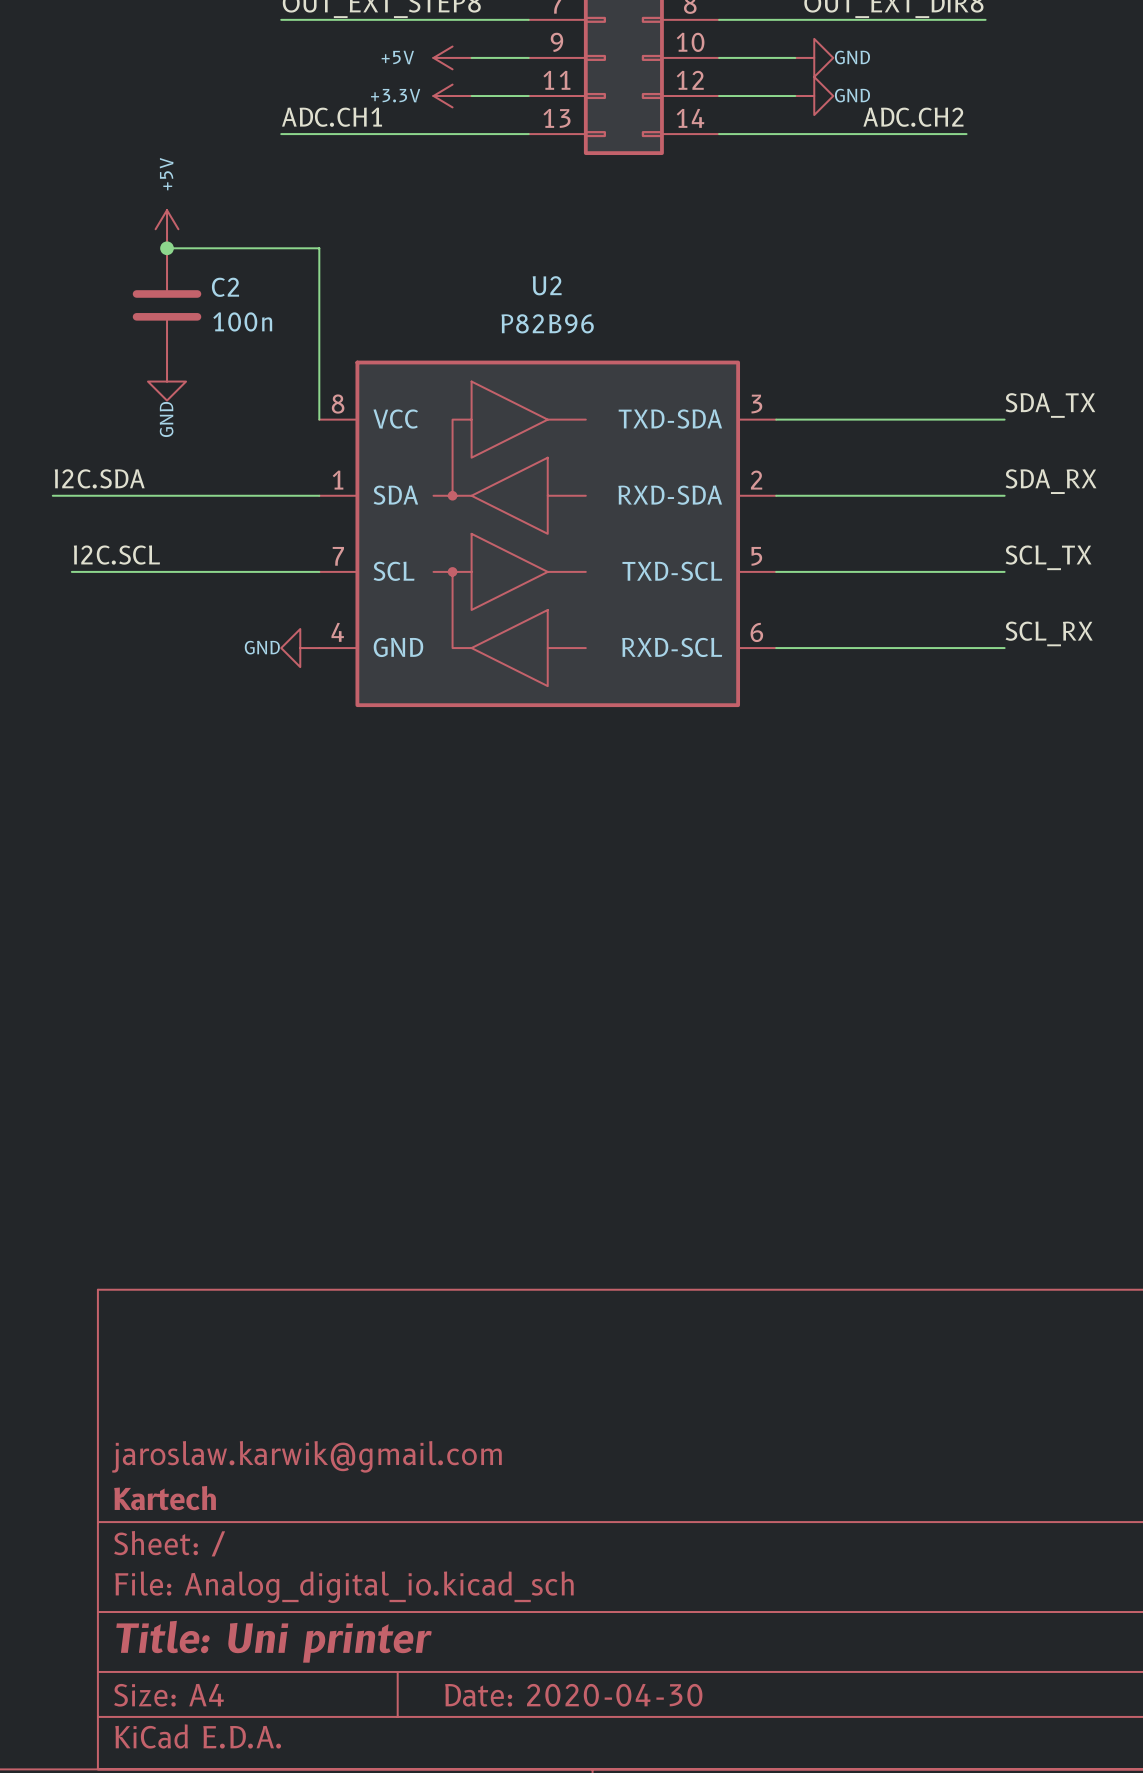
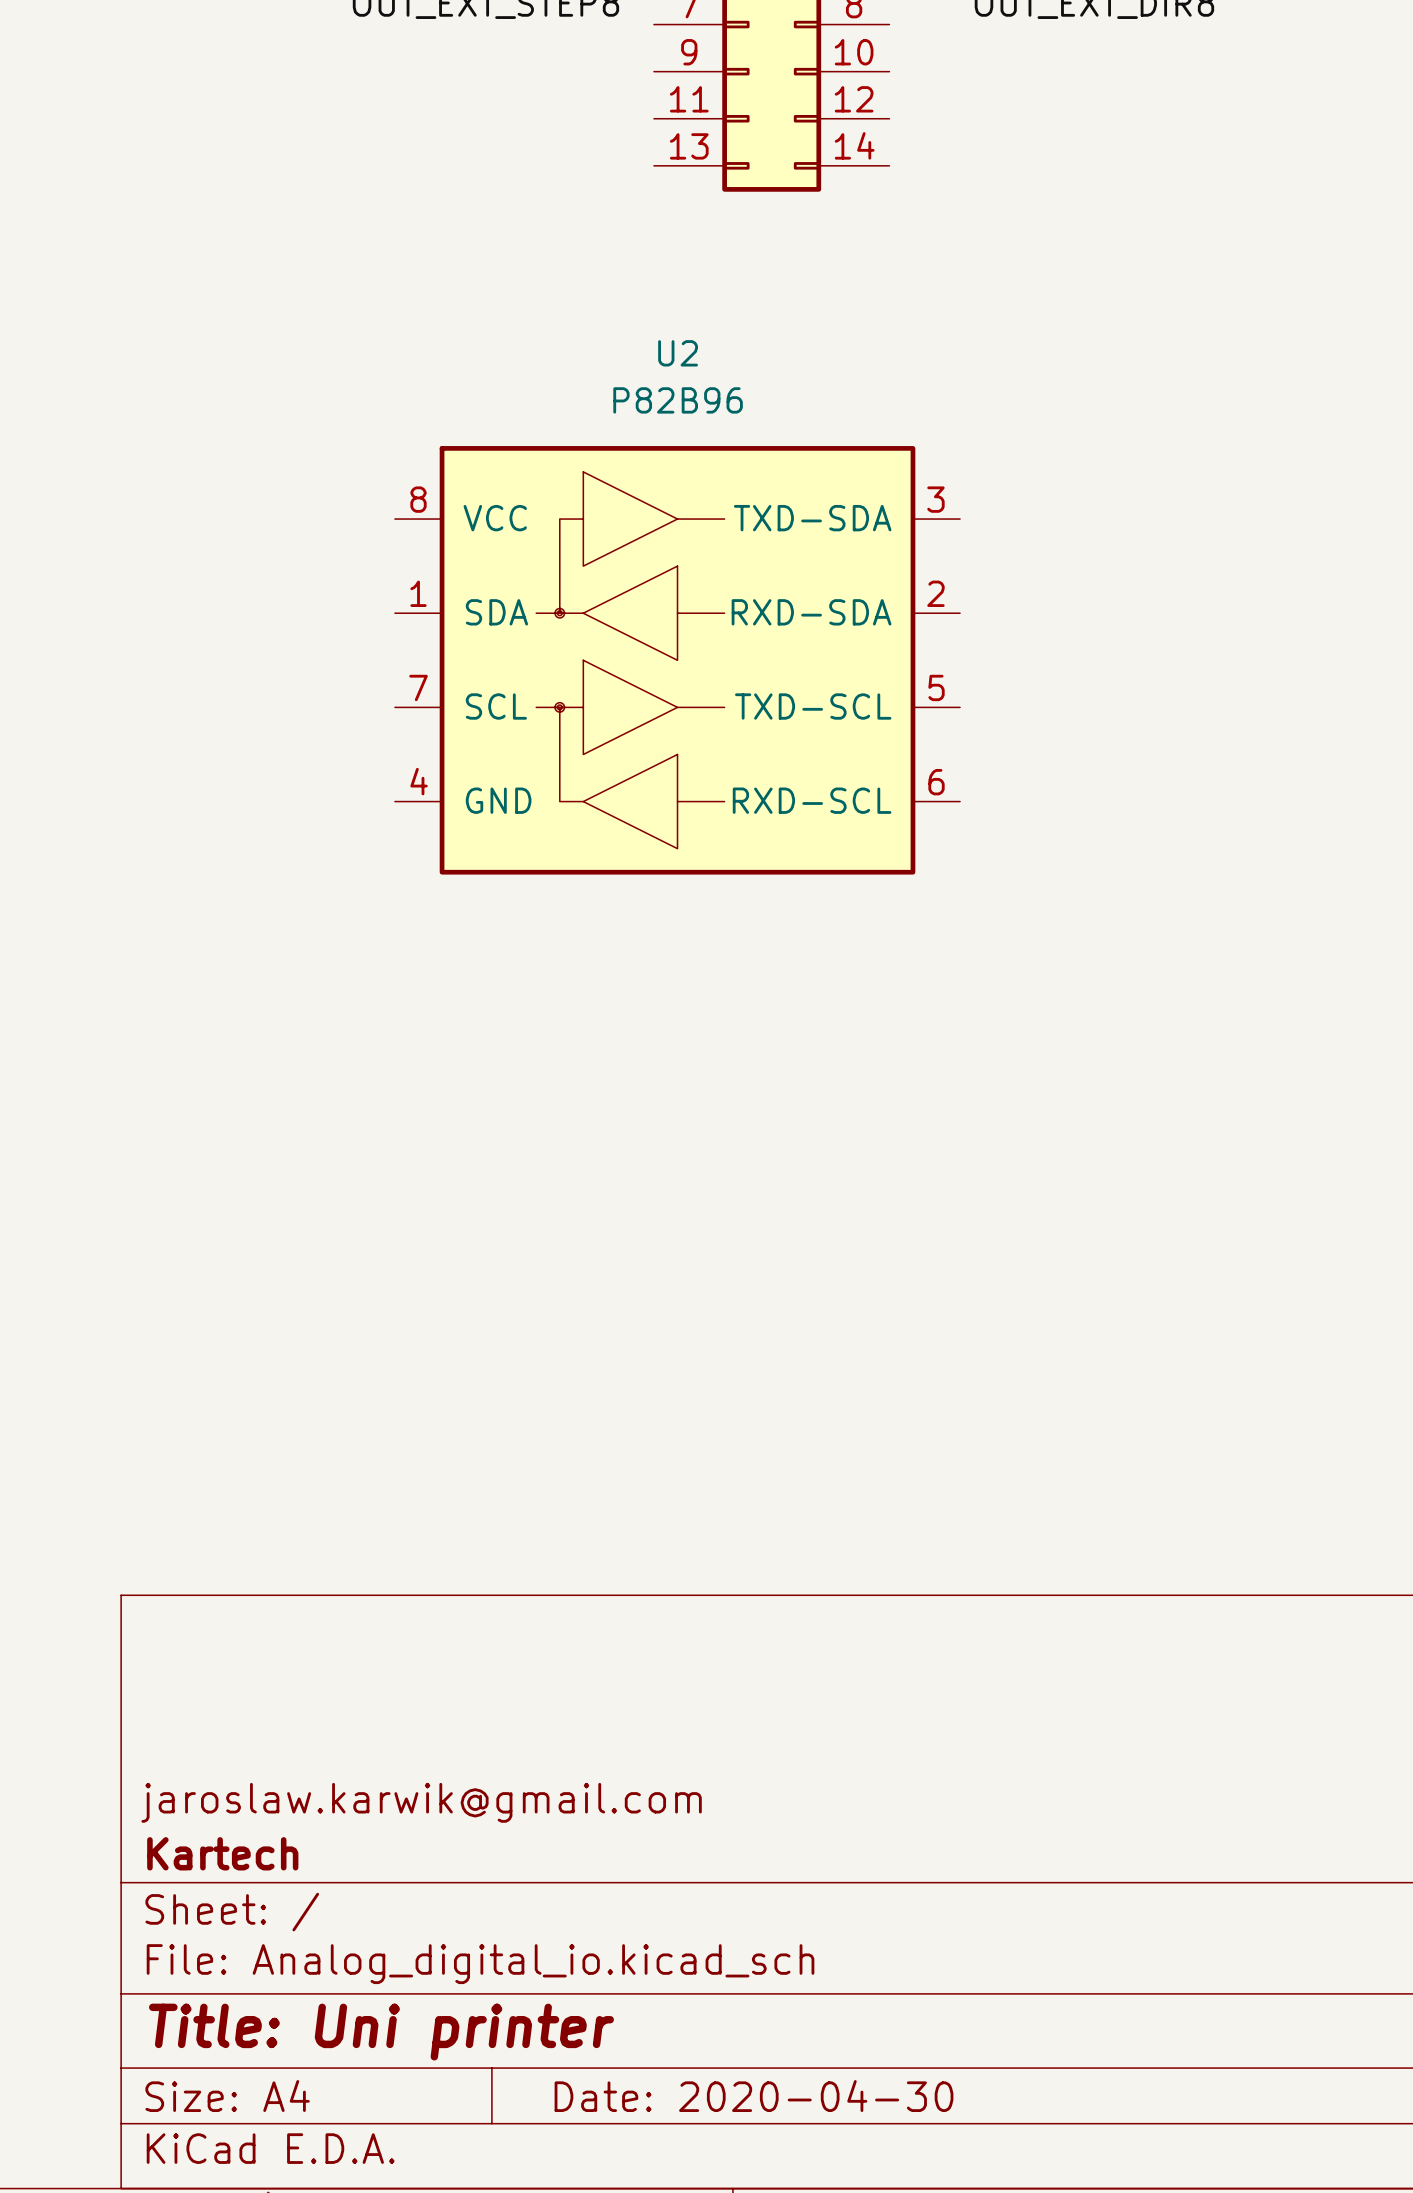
wire: (281, 19) (528, 19) -> none
wire: (719, 19) (985, 19) -> none
power symbol: +5V (452, 57) -> none
wire: (471, 57) (528, 57) -> none
wire: (719, 57) (795, 57) -> none
power symbol: GND (814, 57) -> none
power symbol: +3.3V (452, 96) -> none
wire: (471, 96) (528, 96) -> none
wire: (719, 96) (795, 96) -> none
power symbol: GND (814, 96) -> none
label: ADC.CH1 (332, 117) -> none
label: ADC.CH2 (913, 117) -> none
wire: (281, 134) (528, 134) -> none
wire: (719, 134) (966, 134) -> none
power symbol: +5V (167, 229) -> none
wire: (167, 248) (319, 248) (319, 419) -> none
junction: (167, 248) -> none
C2: 100n (167, 305) -> none
power symbol: GND (167, 381) -> none
label: SDA_TX (1050, 405) -> none
wire: (776, 419) (1004, 419) -> none
label: I2C.SDA (99, 478) -> none
label: SDA_RX (1051, 481) -> none
wire: (52, 495) (319, 495) -> none
wire: (776, 495) (1004, 495) -> none
label: I2C.SCL (116, 555) -> none
label: SCL_TX (1048, 557) -> none
wire: (71, 571) (319, 571) -> none
wire: (776, 571) (1004, 571) -> none
label: SCL_RX (1049, 633) -> none
power symbol: GND (300, 648) -> none
wire: (776, 648) (1004, 648) -> none

